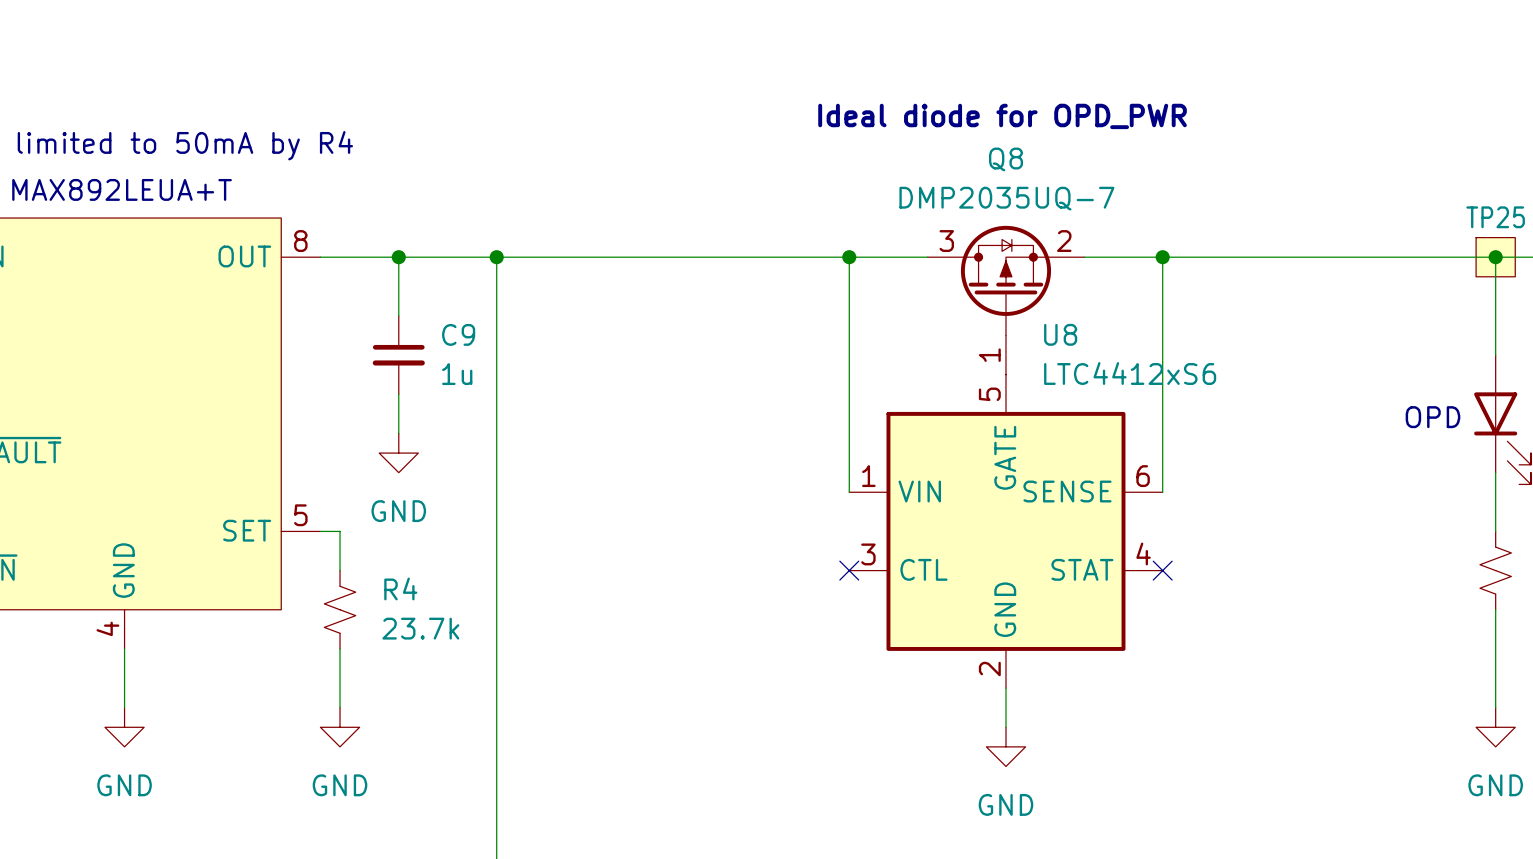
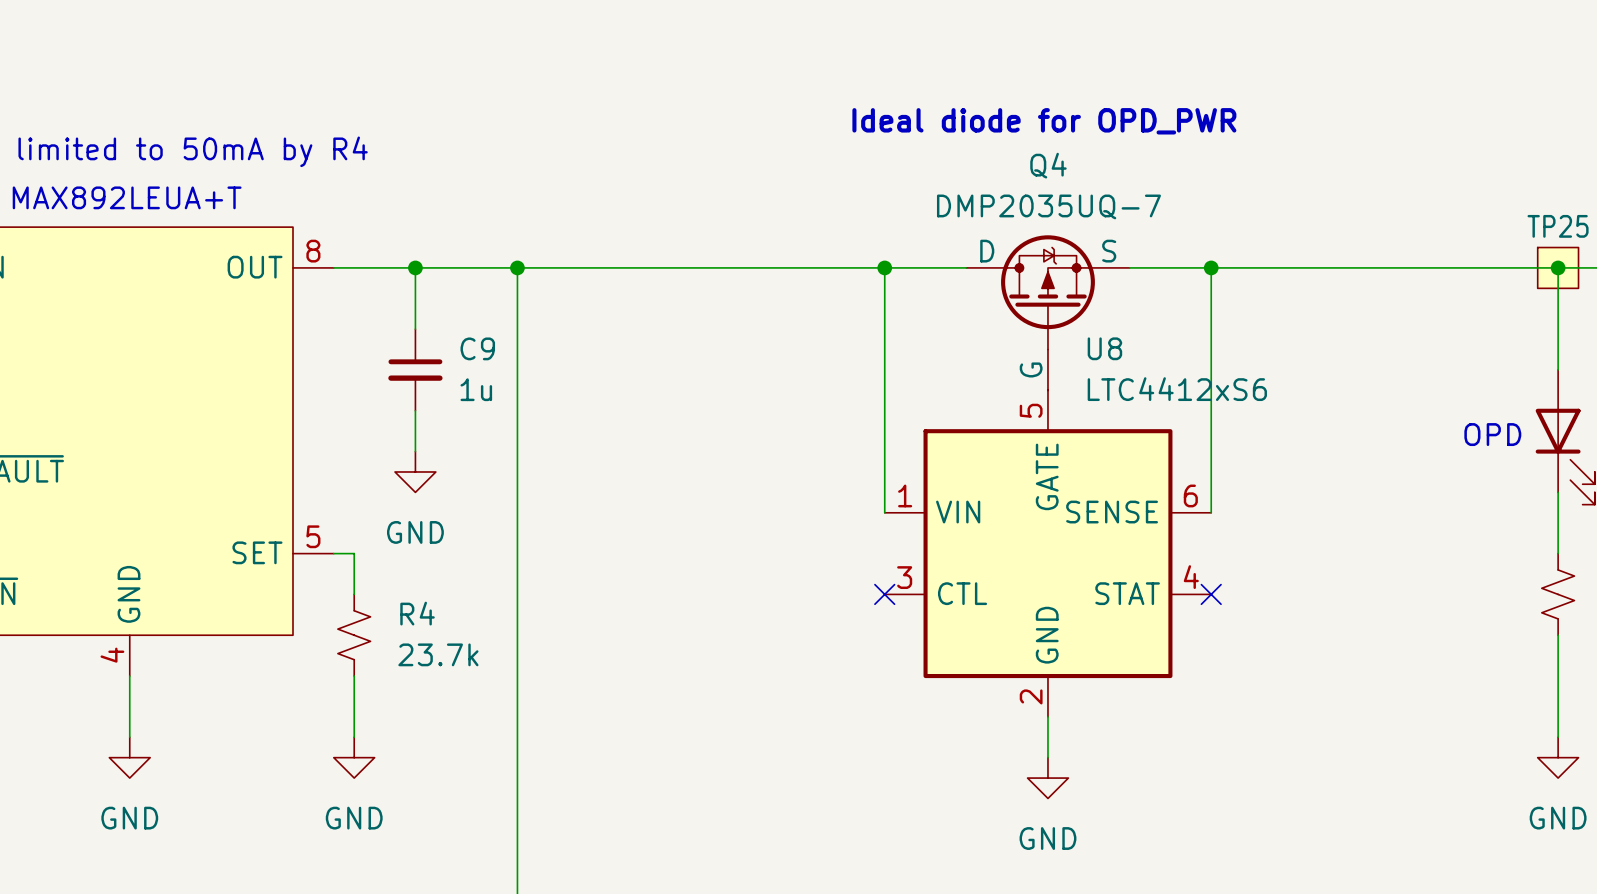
Q8: DMP2035UQ-7 (1005, 300) -> none
Q4: none -> DMP2035UQ-7 (1047, 312)

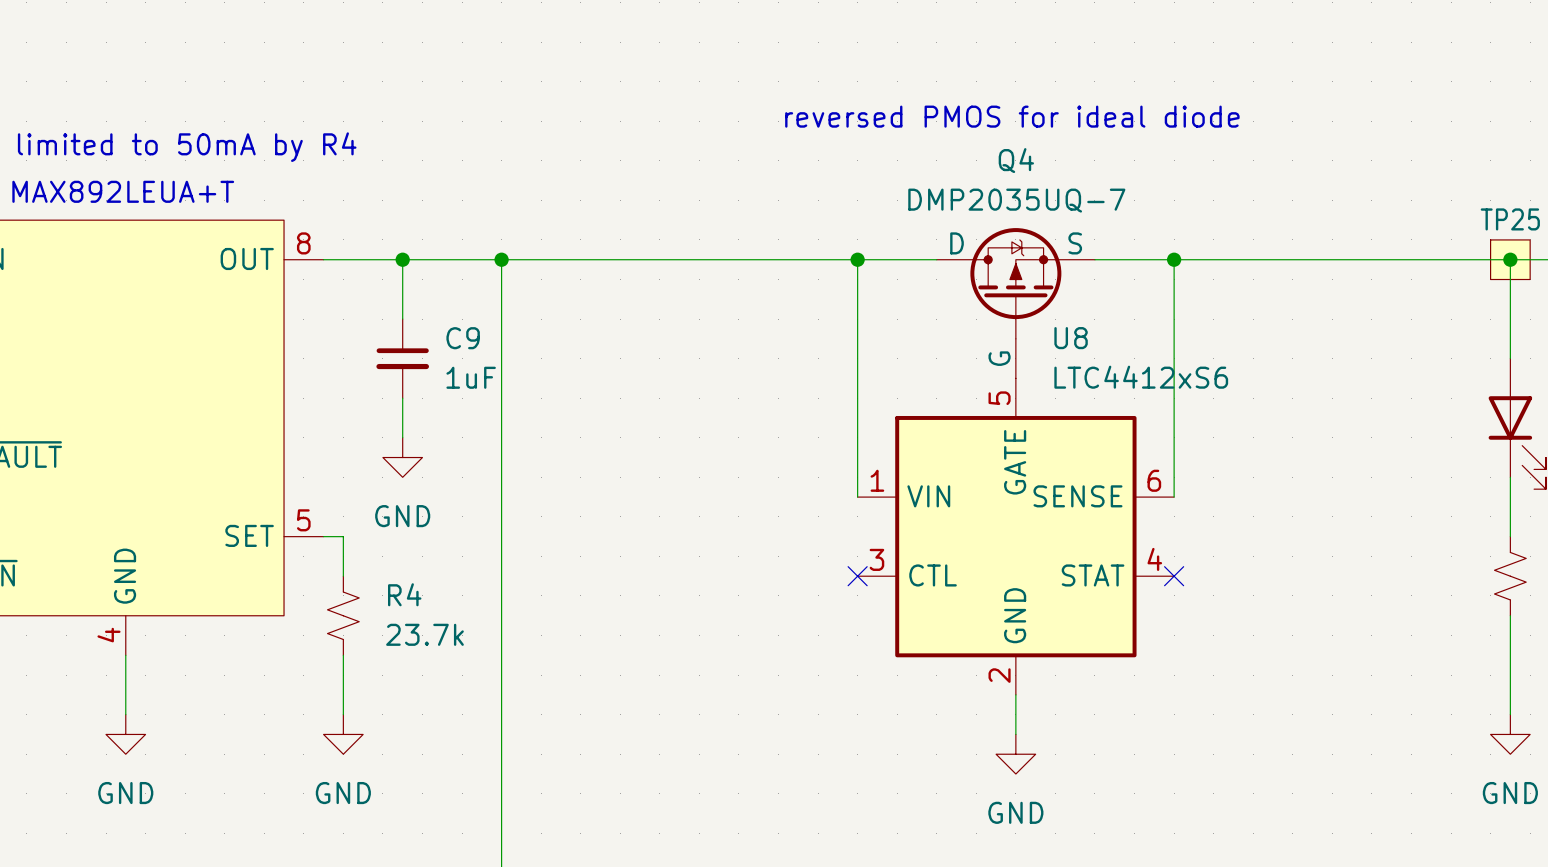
text: Ideal diode for OPD_PWR (1044, 121) -> reversed PMOS for ideal diode (1012, 116)
C9 value: 1u (476, 389) -> 1uF (471, 377)
text: OPD (1492, 434) -> none

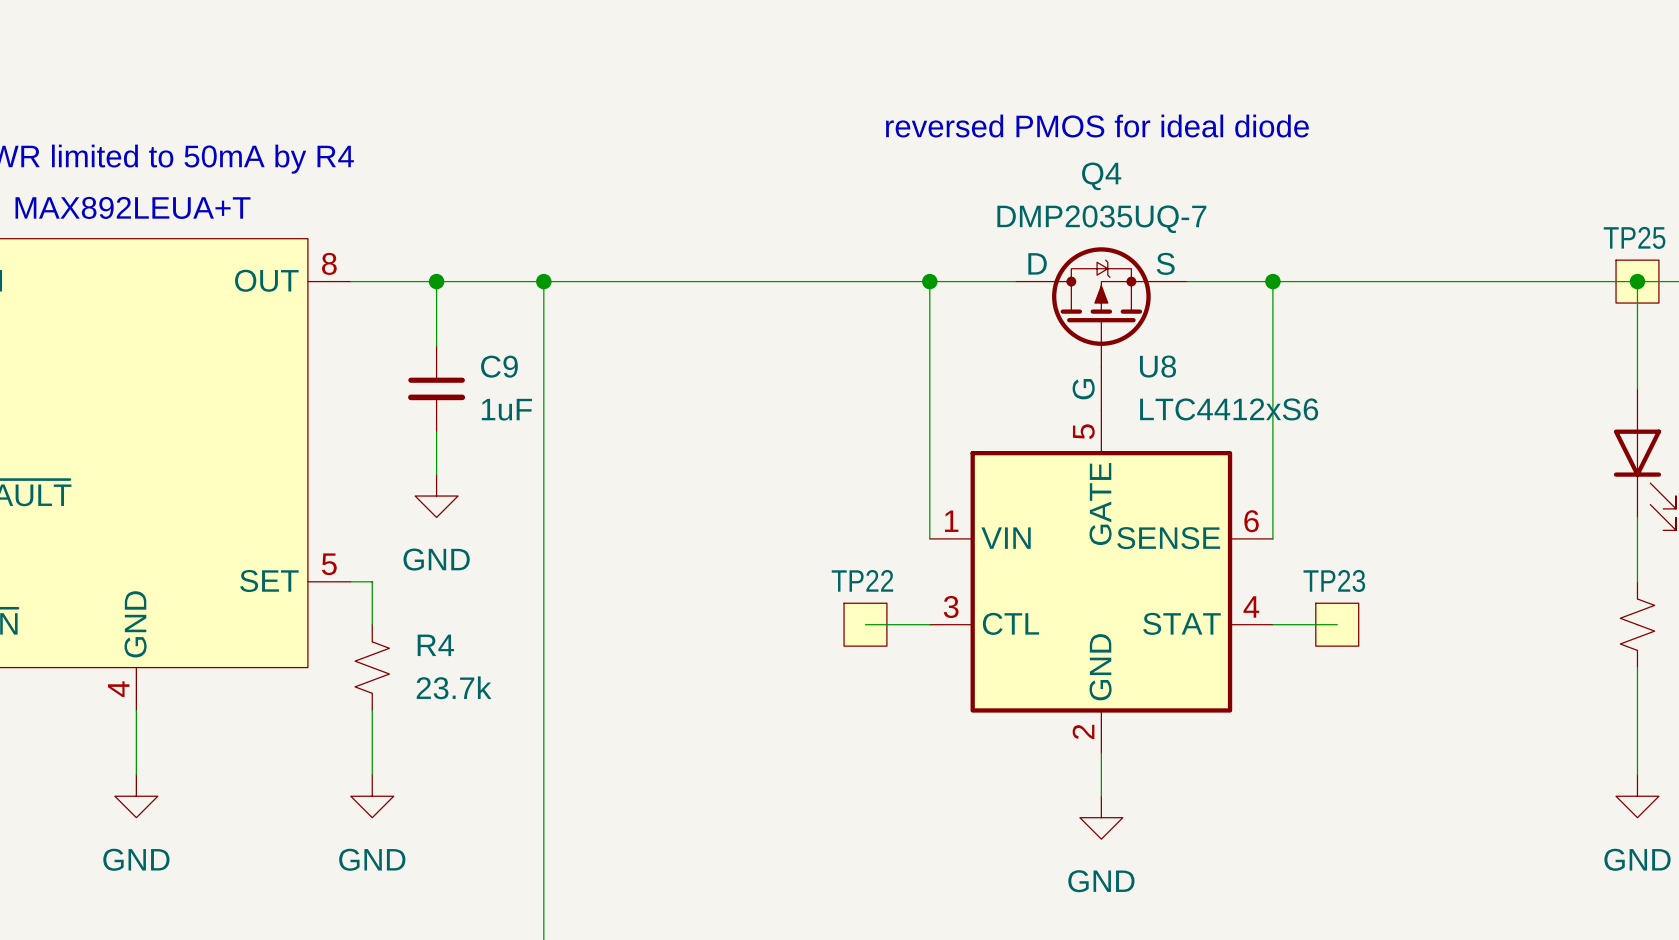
wire: none -> (865, 624) (929, 624)
TP22: none -> (865, 624)
no-connect mark: (857, 576) -> none
wire: none -> (1272, 624) (1337, 624)
no-connect mark: (1174, 576) -> none
TP23: none -> (1337, 624)

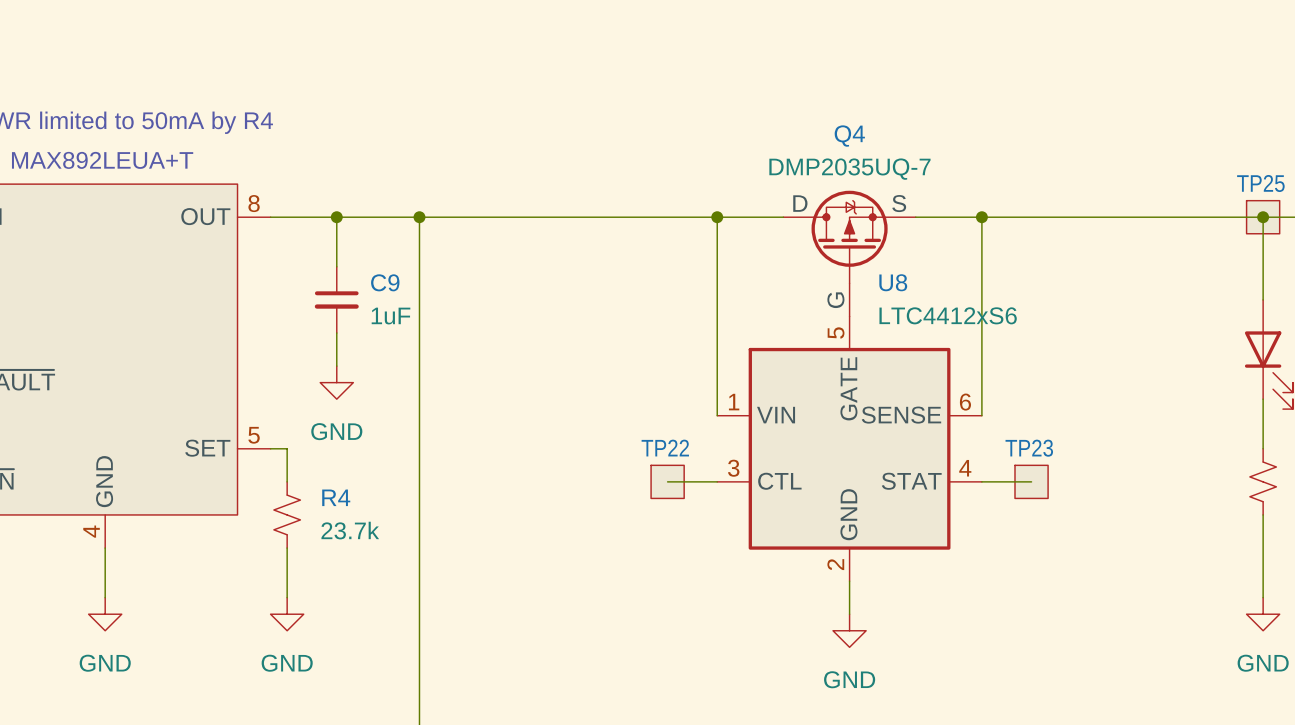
text: reversed PMOS for ideal diode (1097, 126) -> none

